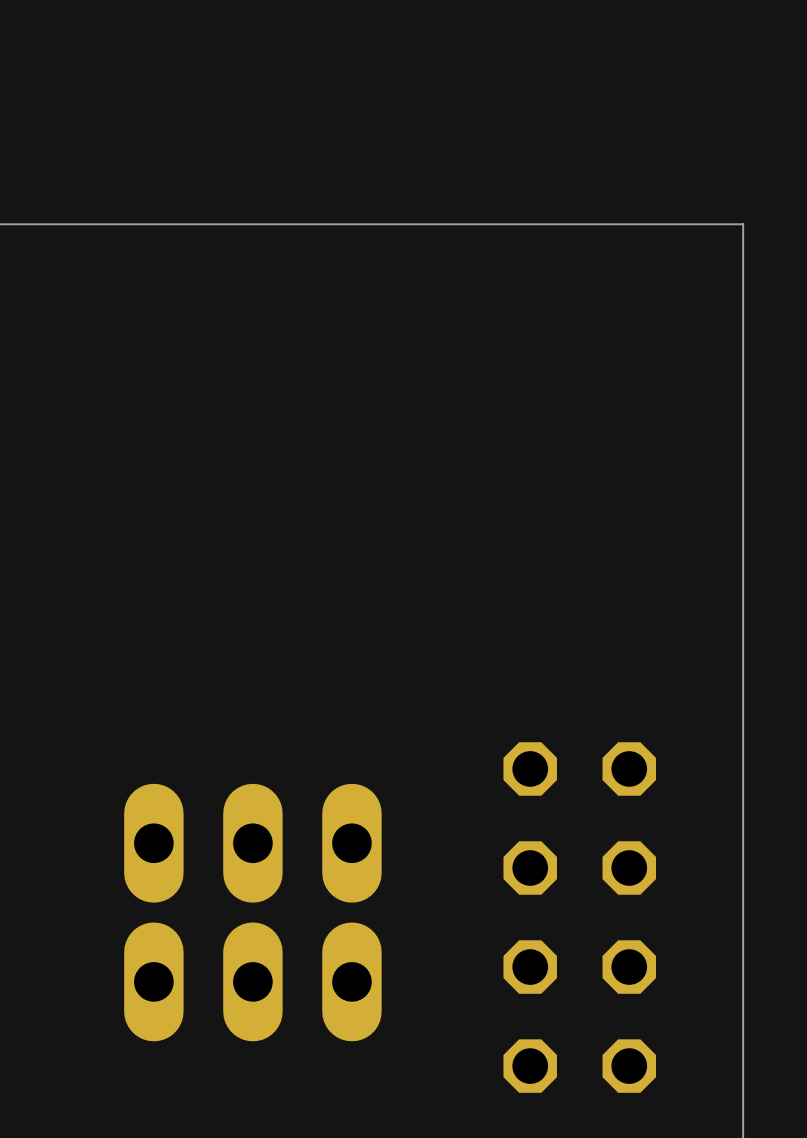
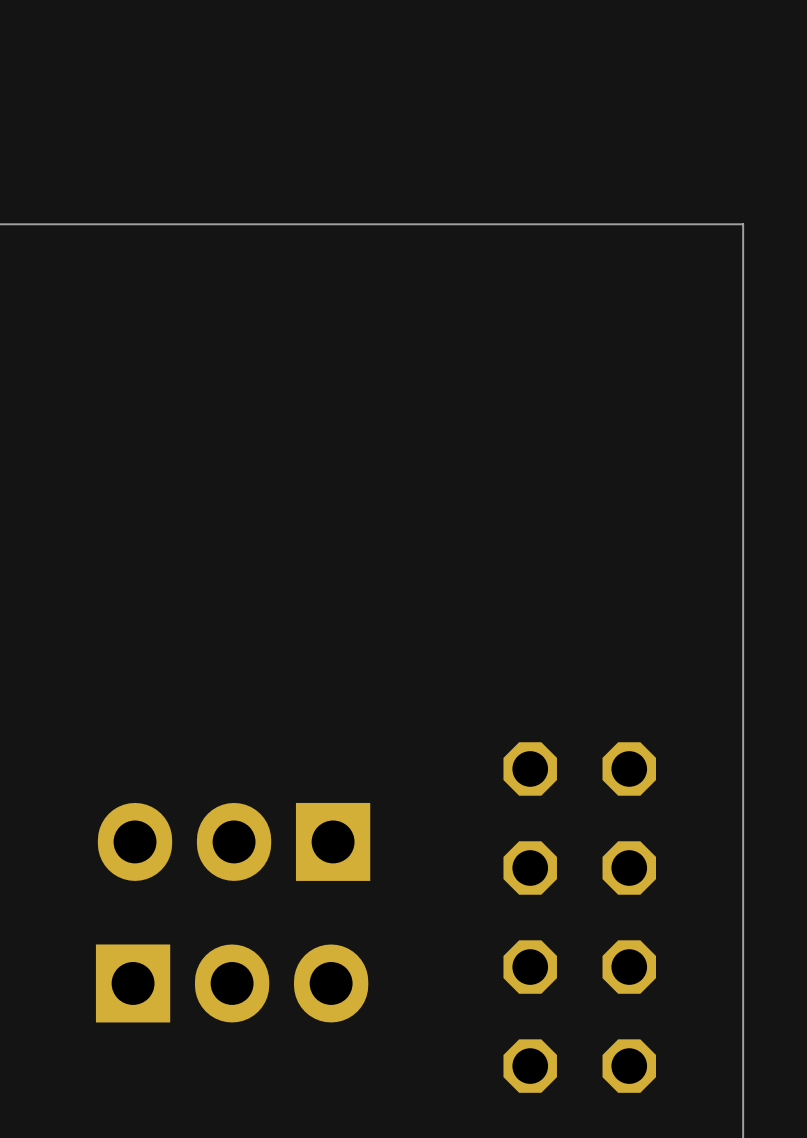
part footprint: [124, 783, 382, 903] -> [97, 802, 371, 881]
part footprint: [124, 922, 382, 1042] -> [95, 944, 369, 1023]

